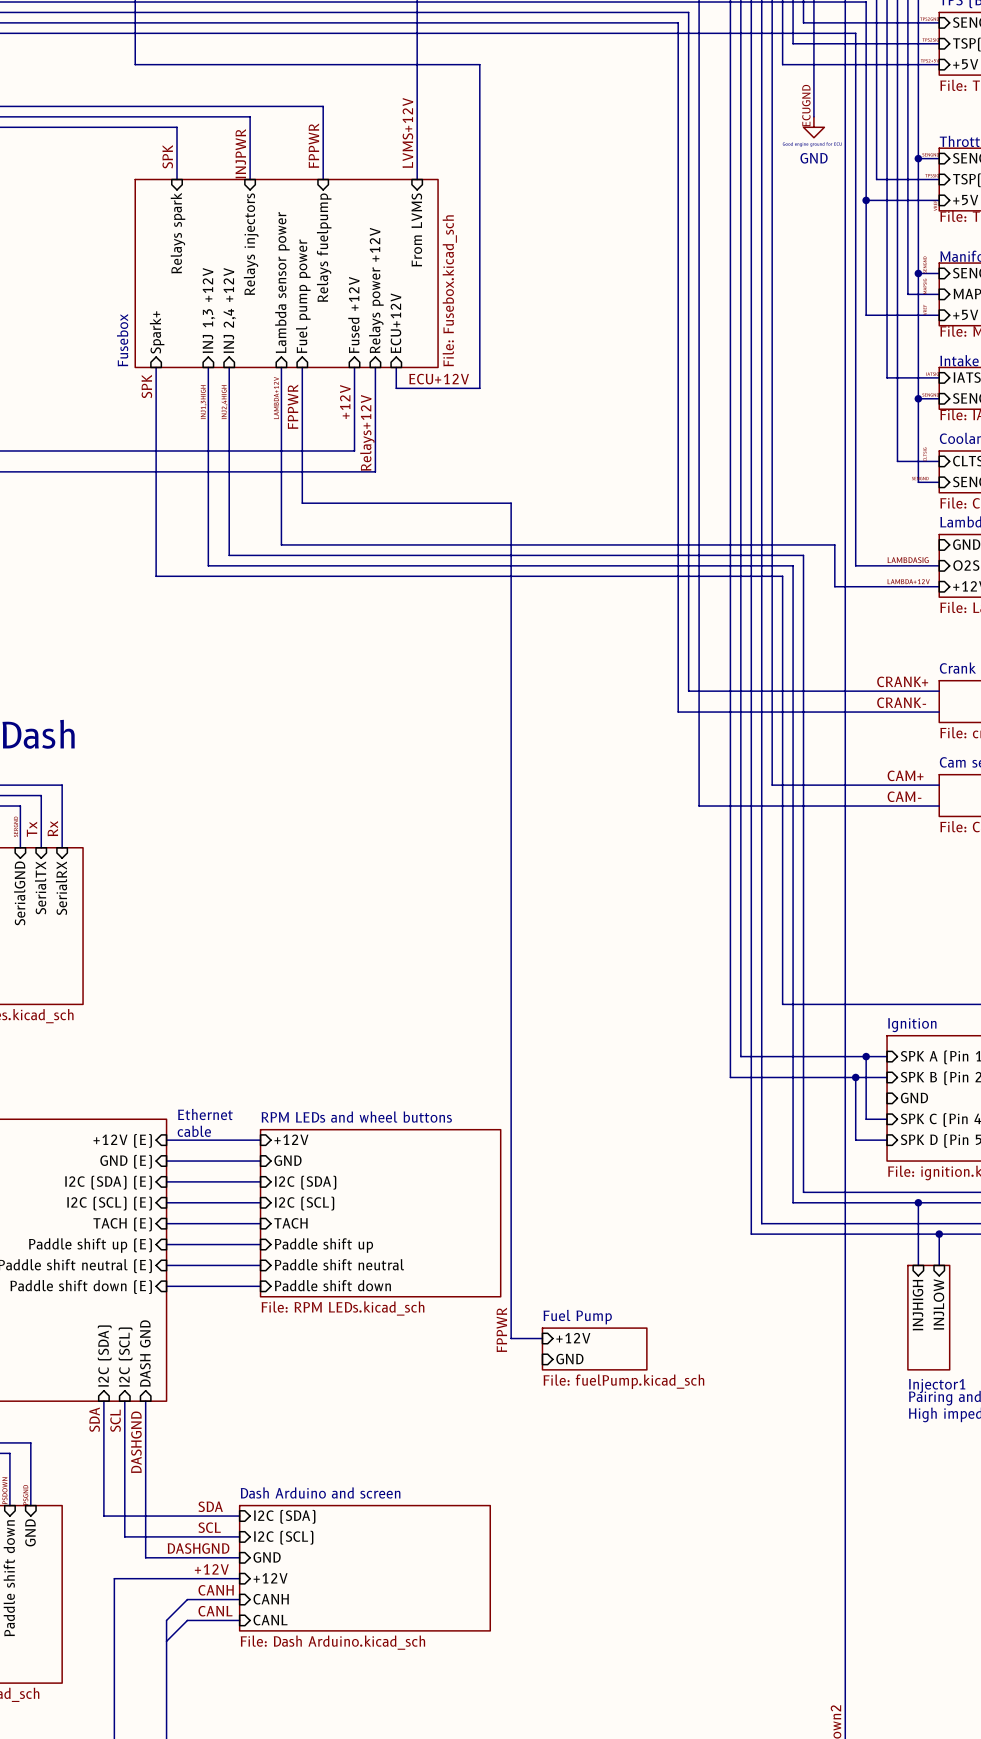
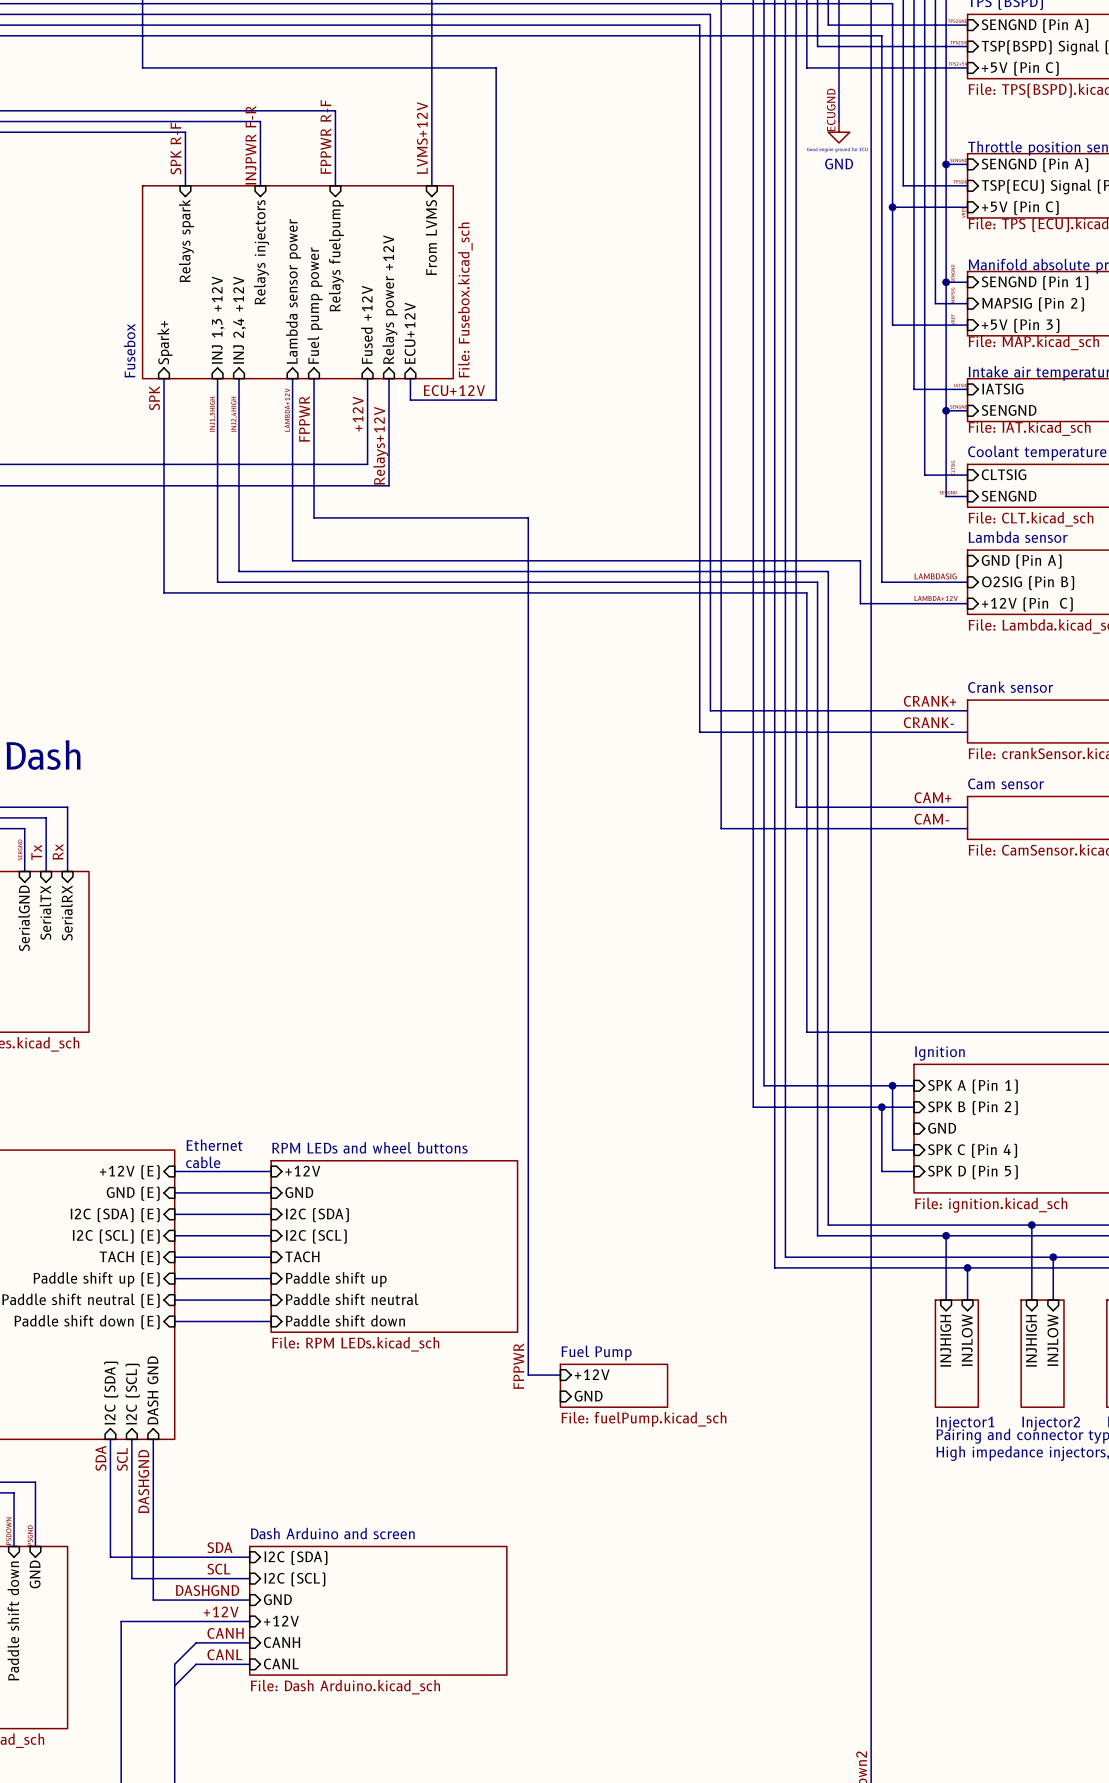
label: FPPWR (313, 145) -> FPPWR R-F (325, 137)
label: INJPWR (240, 153) -> INJPWR F-R (250, 145)
label: SPK (167, 156) -> SPK R-F (175, 148)

